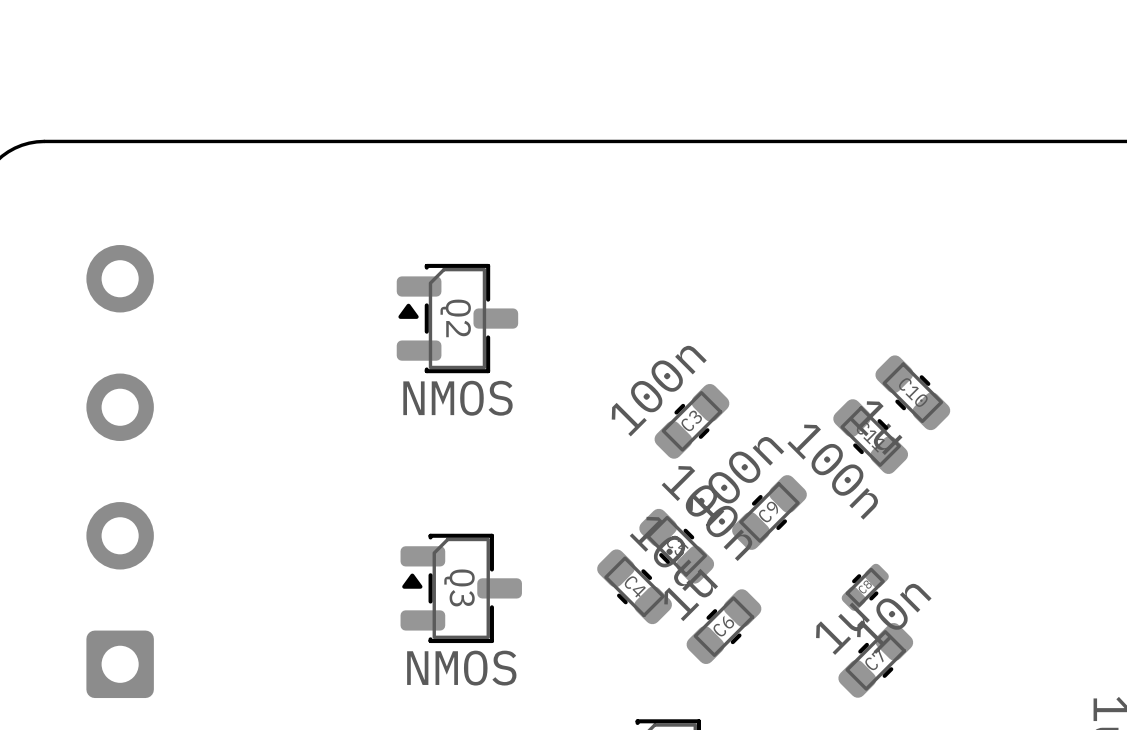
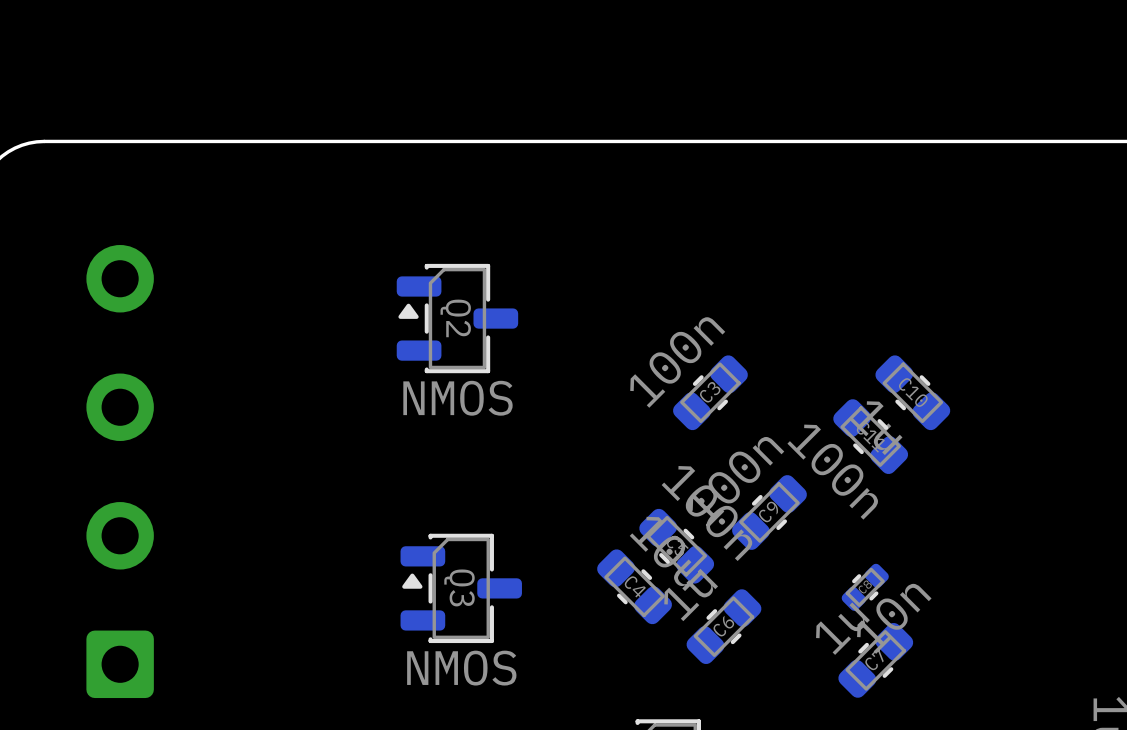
C3 position: (691, 421) -> (710, 392)

